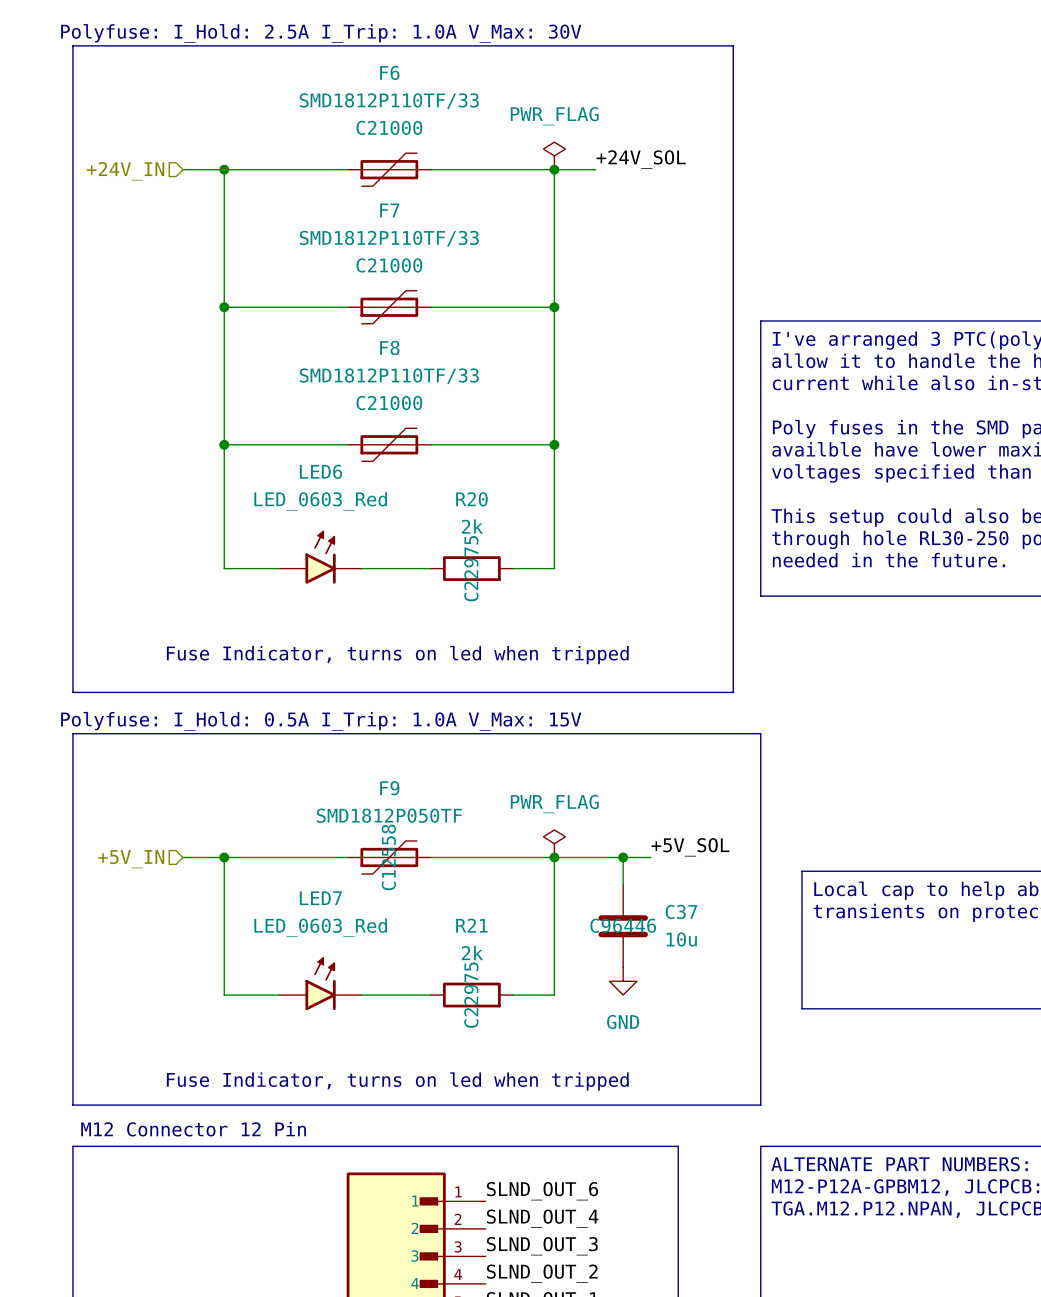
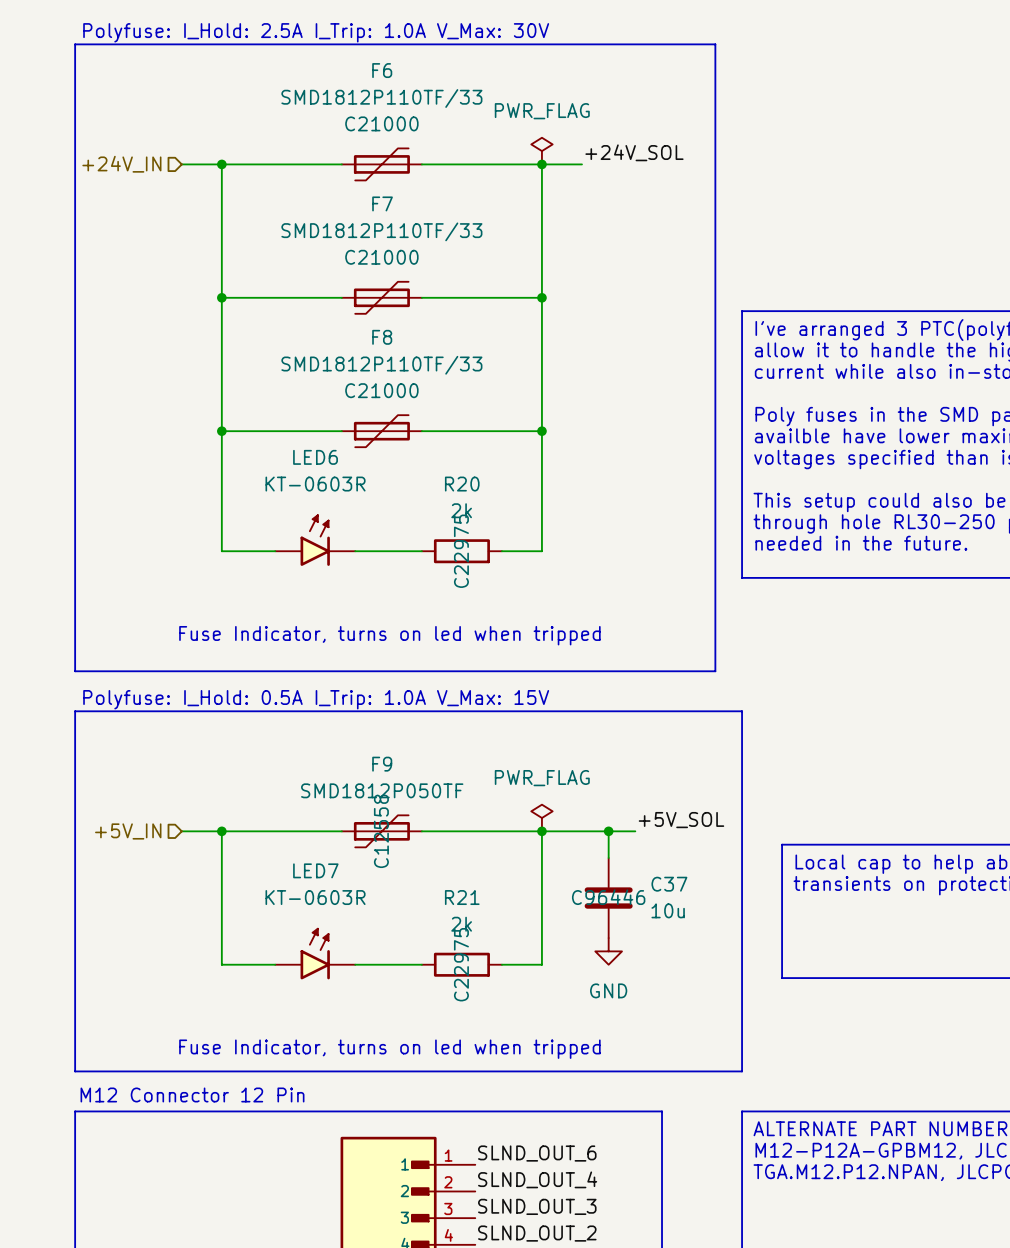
LED6 value: LED_0603_Red (320, 501) -> KT-0603R (315, 484)
LED7 value: LED_0603_Red (320, 927) -> KT-0603R (315, 897)

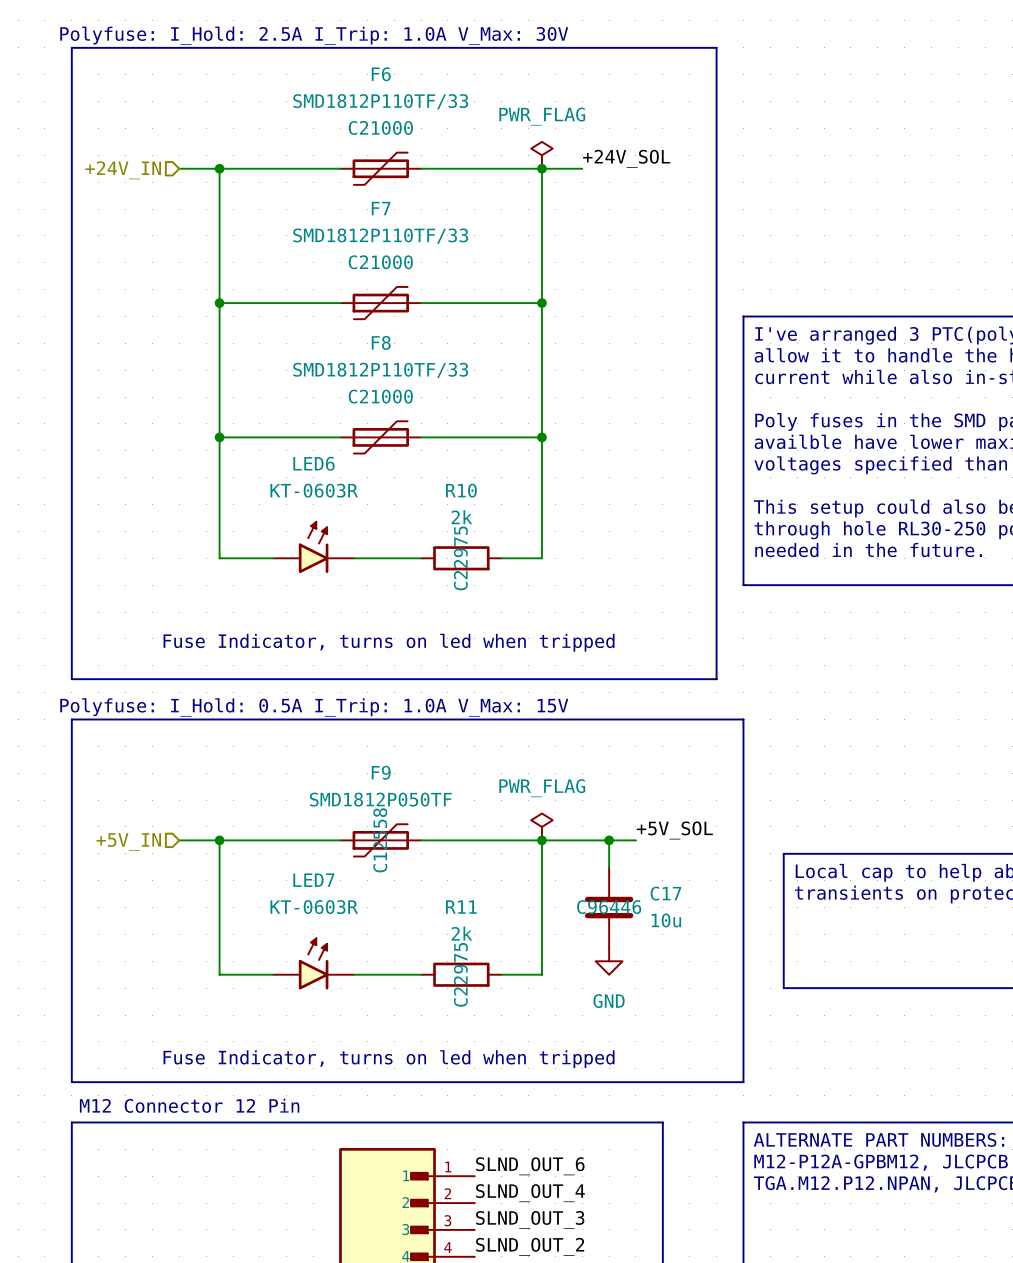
R20 name: R20 (462, 484) -> R10 (461, 490)
C37 name: C37 (669, 884) -> C17 (666, 893)
R21 name: R21 (462, 897) -> R11 (461, 907)

